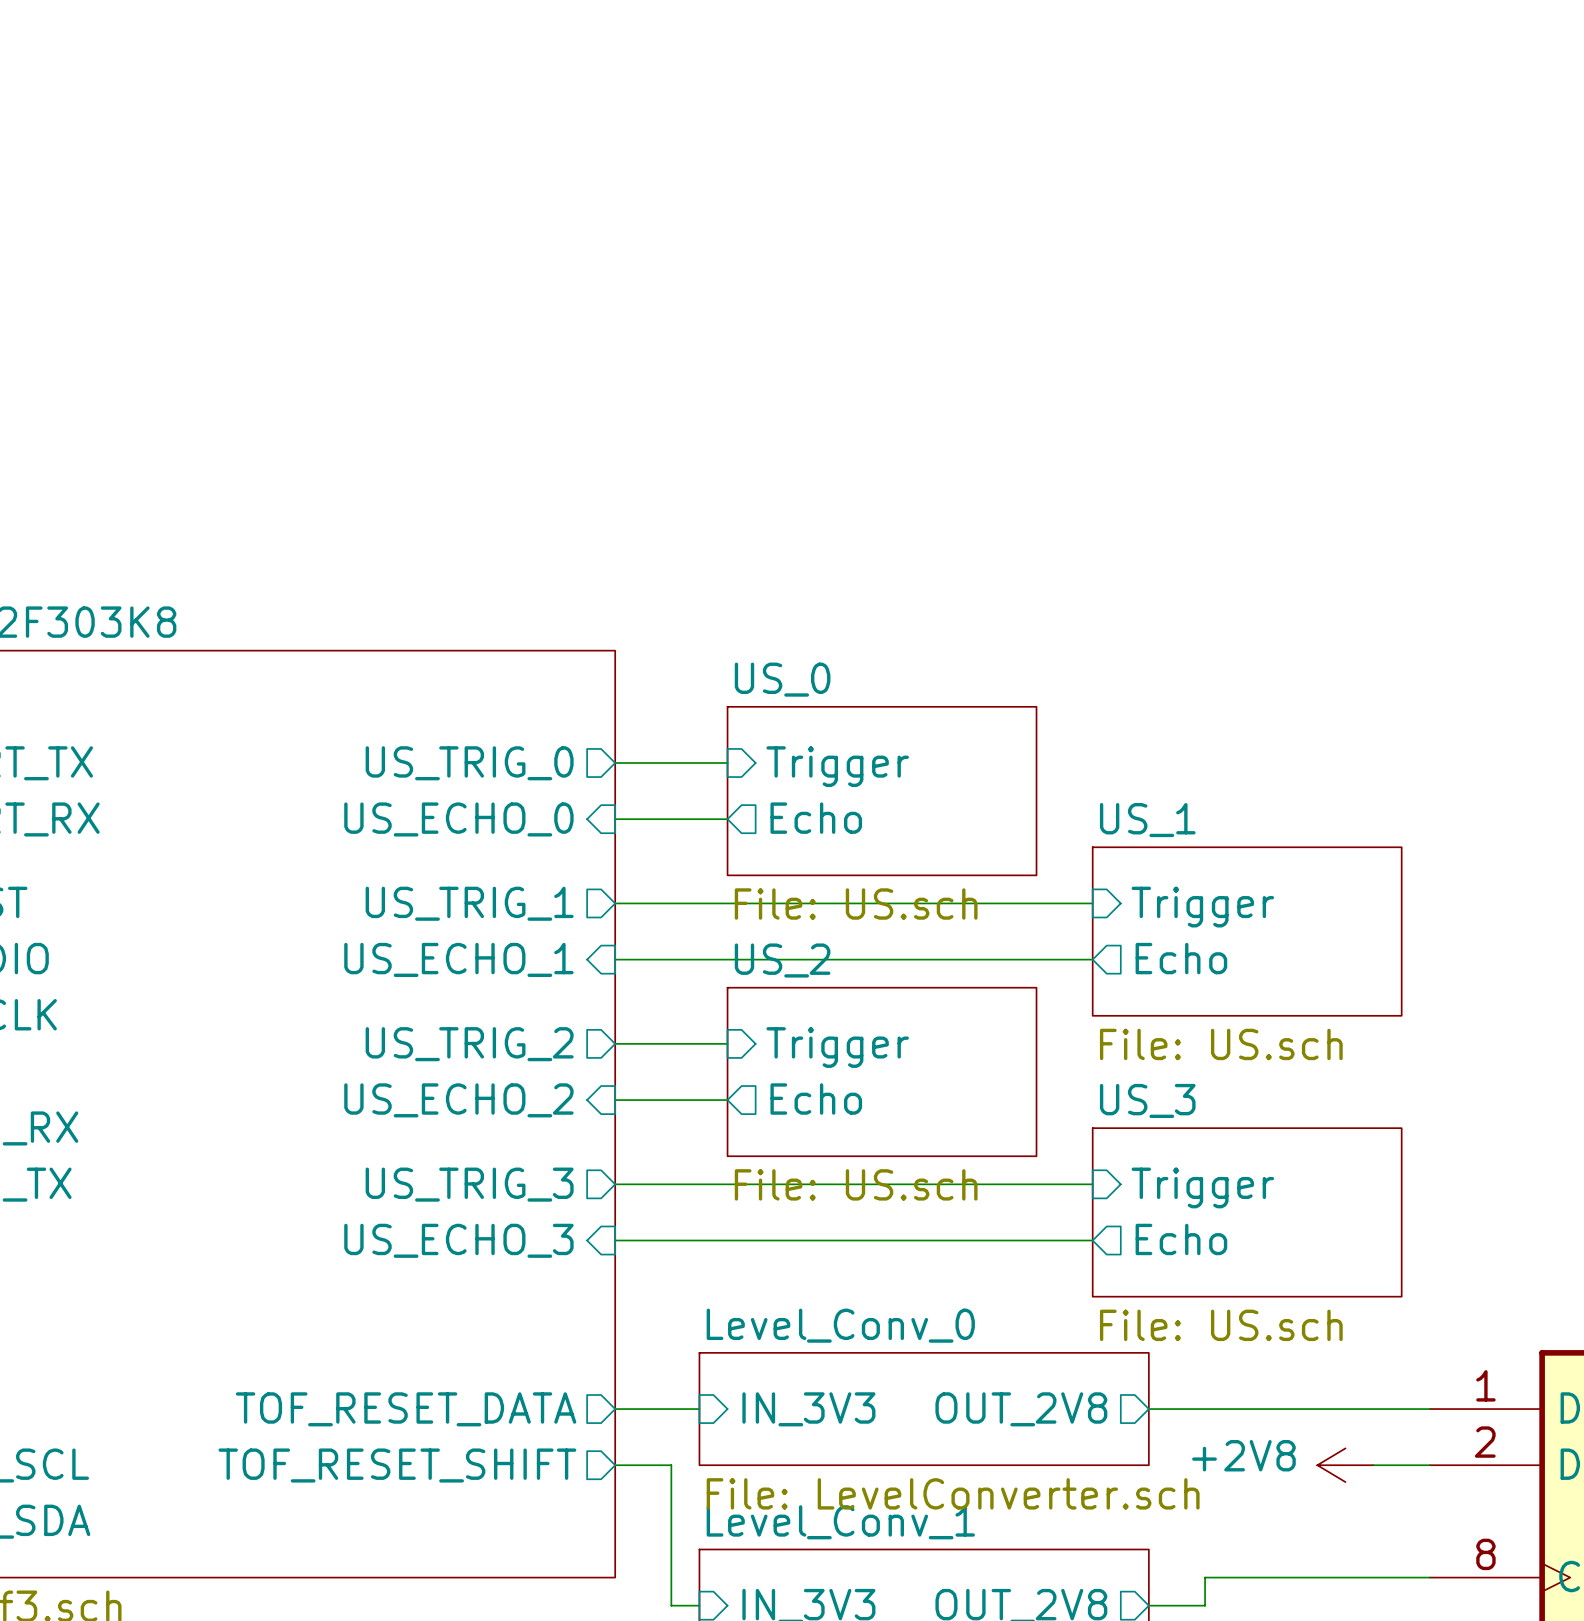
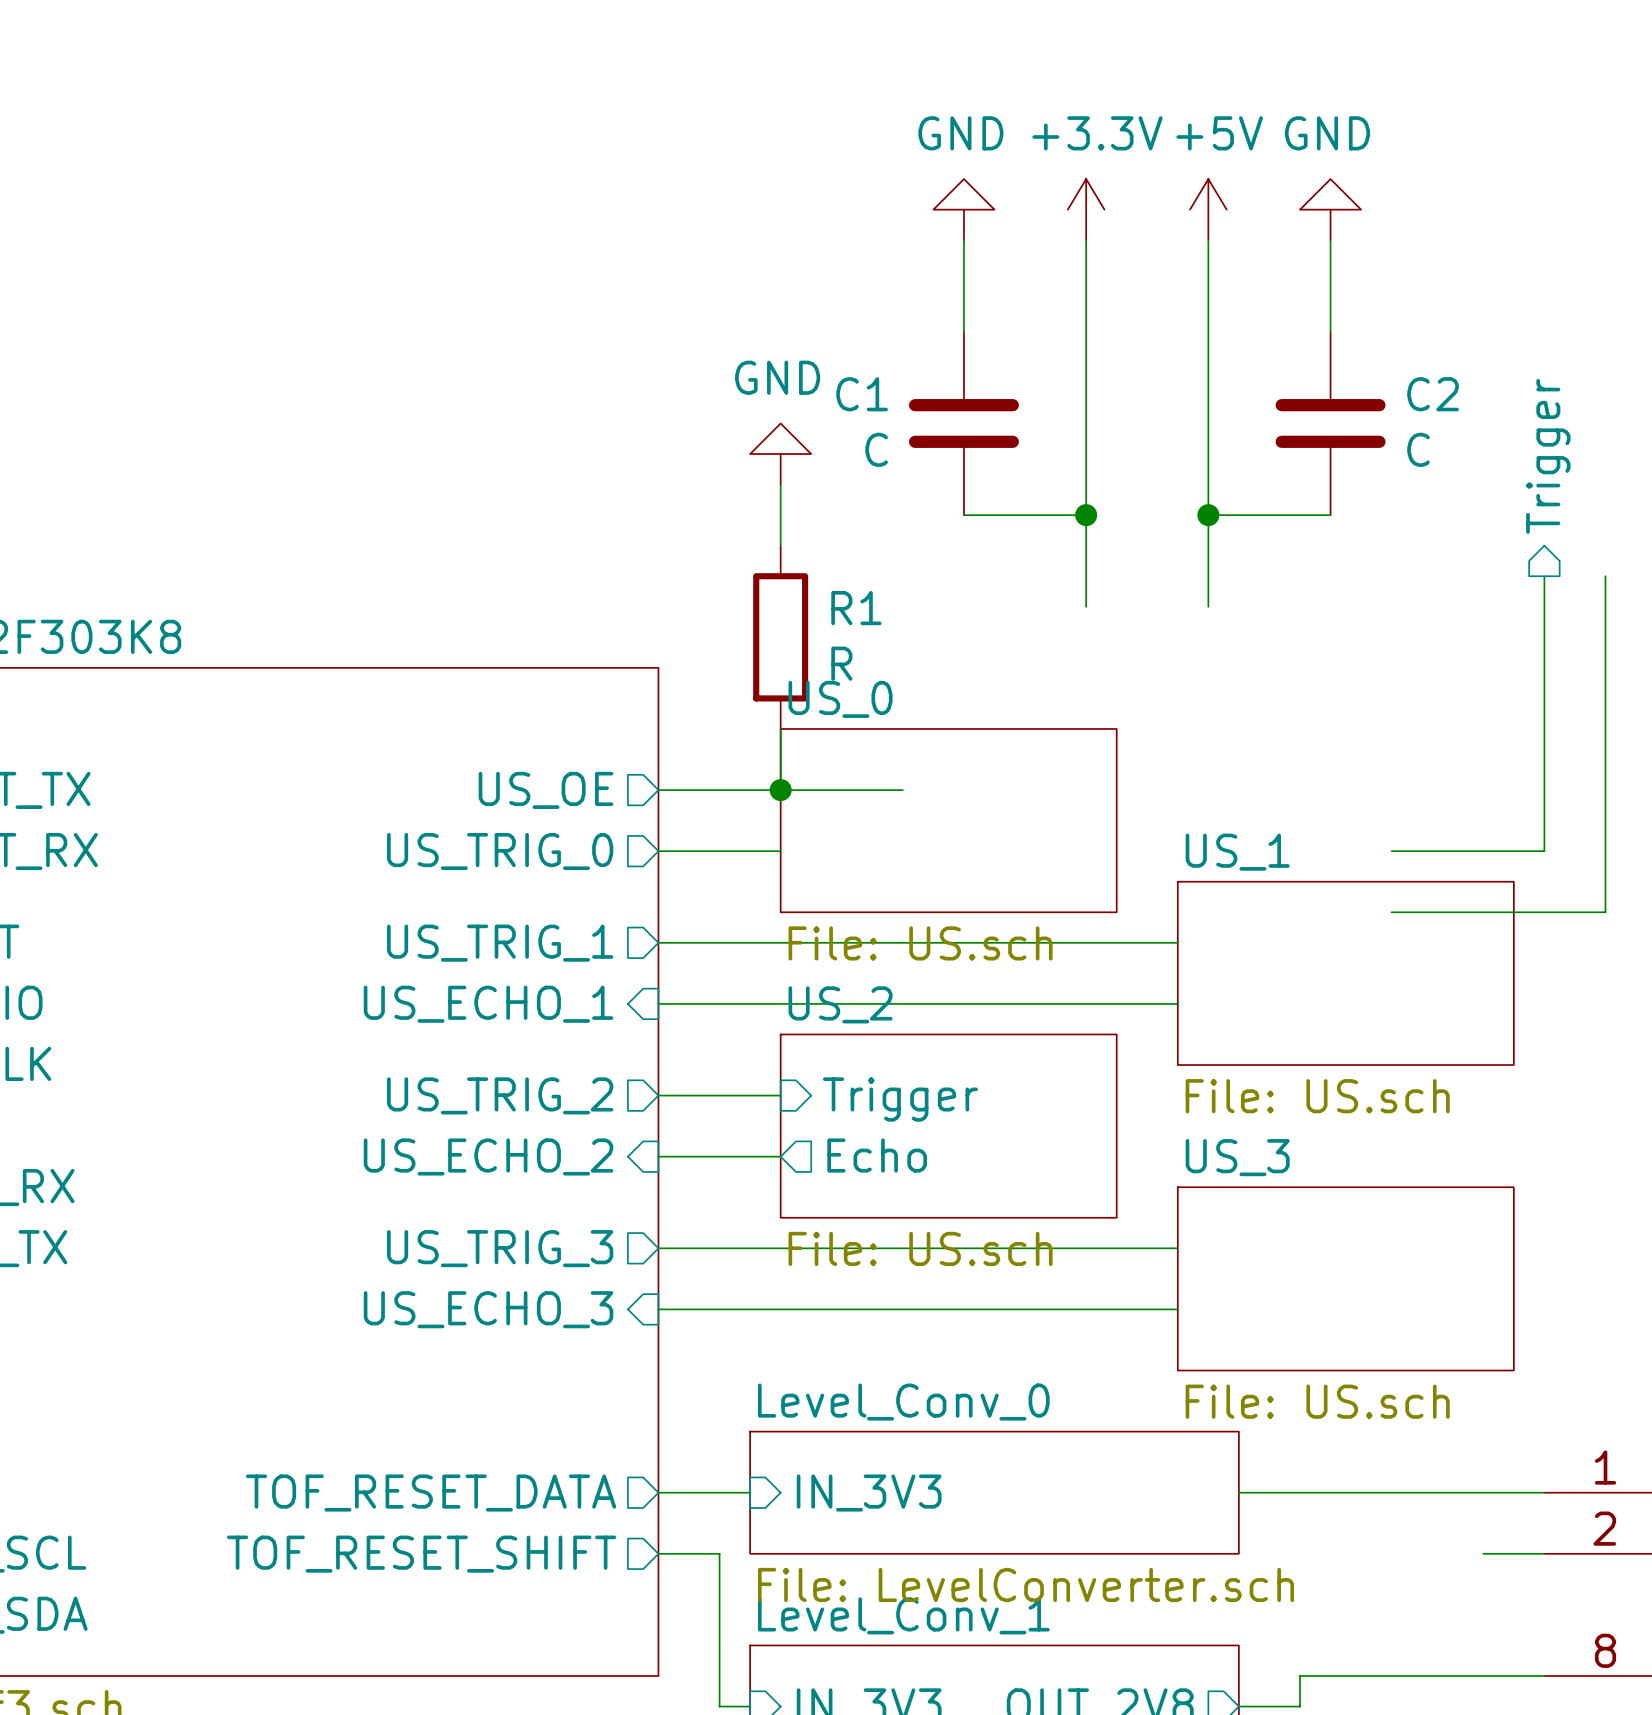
power symbol: none -> GND (963, 209)
power symbol: none -> +3.3V (1086, 209)
power symbol: none -> +5V (1208, 209)
power symbol: none -> GND (1330, 209)
wire: none -> (963, 240) (963, 331)
wire: none -> (1086, 240) (1086, 606)
wire: none -> (1208, 240) (1208, 606)
wire: none -> (1330, 240) (1330, 331)
C1: none -> C (963, 423)
C2: none -> C (1330, 423)
power symbol: none -> GND (780, 454)
sheet pin: none -> Trigger (1548, 456)
wire: none -> (780, 484) (780, 545)
wire: none -> (963, 515) (1086, 515)
junction: none -> (1086, 515)
wire: none -> (1208, 515) (1330, 515)
junction: none -> (1208, 515)
wire: none -> (1544, 576) (1544, 851) (1391, 851)
wire: none -> (1605, 576) (1605, 912) (1391, 912)
R1: none -> R (780, 637)
wire: none -> (780, 728) (780, 790) (902, 790)
sheet pin: US_TRIG_0 (469, 763) -> US_OE (545, 790)
junction: none -> (780, 790)
sheet pin: Trigger (837, 766) -> none
sheet pin: Echo (816, 818) -> none
sheet pin shape: input (458, 819) -> output (500, 851)
sheet pin: US_ECHO_0 (458, 819) -> US_TRIG_0 (500, 851)
sheet pin: Trigger (1202, 907) -> none
sheet pin: Echo (1181, 958) -> none
sheet pin: Trigger (1202, 1187) -> none
sheet pin: Echo (1181, 1239) -> none
sheet pin: OUT_2V8 (1021, 1409) -> none
power symbol: +2V8 (1345, 1465) -> none

